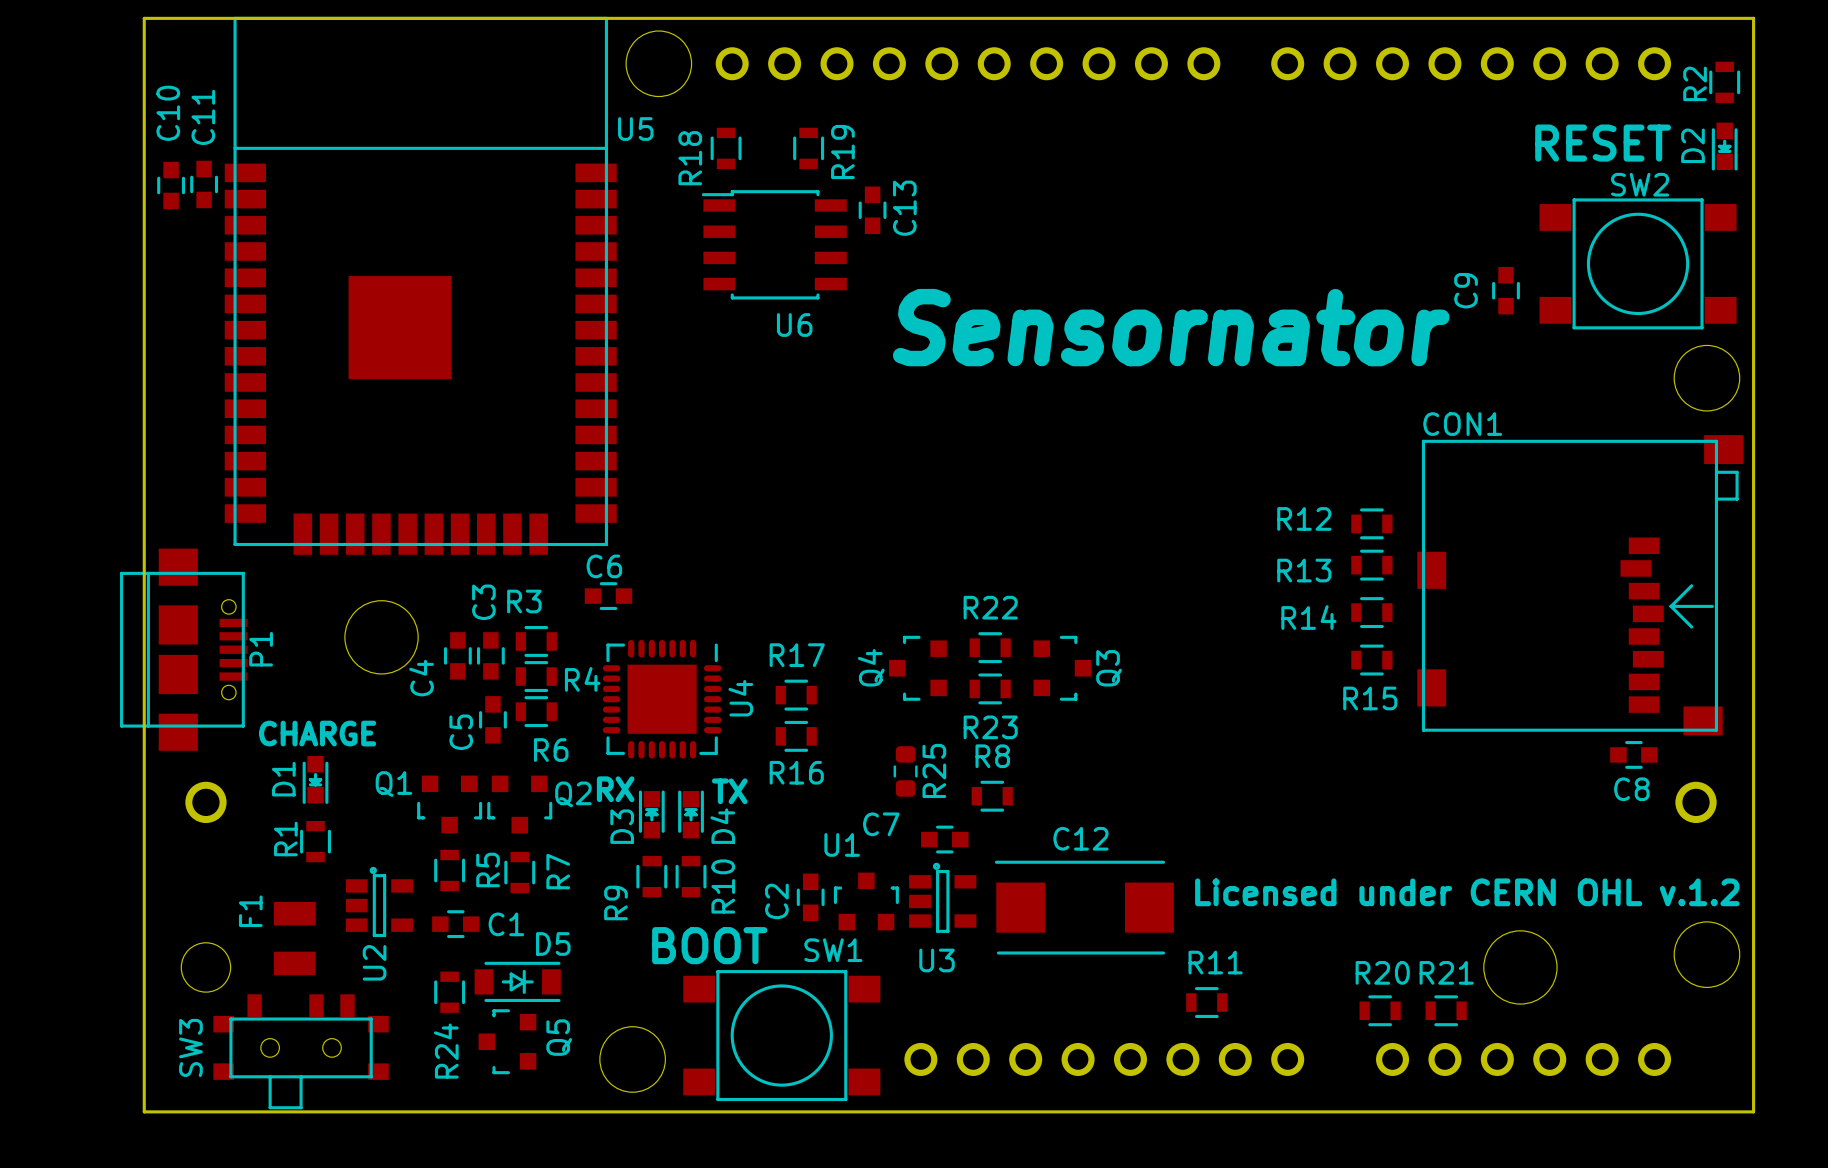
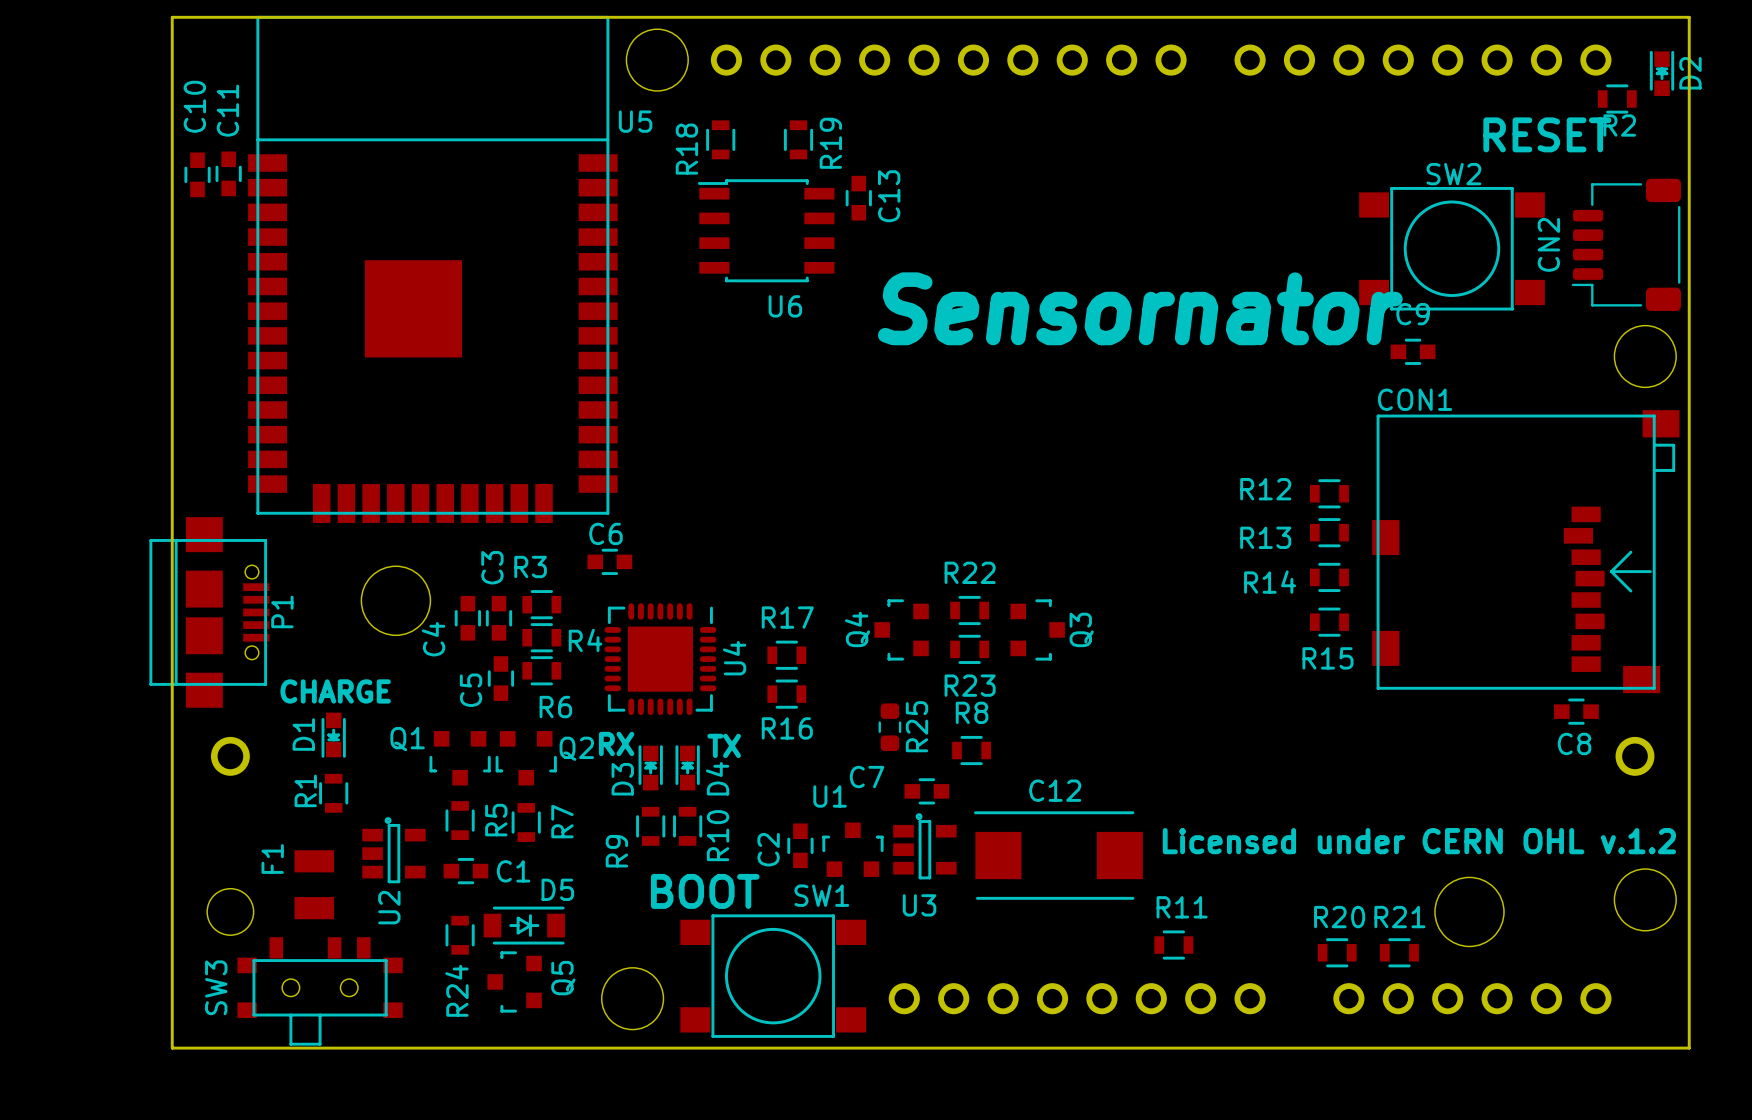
R2 rotation: 0° (1724, 82) -> 90° clockwise (1617, 98)
R2 position: (1724, 82) -> (1617, 98)
D2 rotation: 0° (1724, 146) -> 180° (1662, 73)
D2 position: (1724, 146) -> (1662, 73)
CN2: none -> (1626, 244)
SW2 position: (1638, 263) -> (1451, 248)
C9 rotation: 0° (1505, 290) -> 90° clockwise (1413, 351)
C9 position: (1505, 290) -> (1413, 351)

